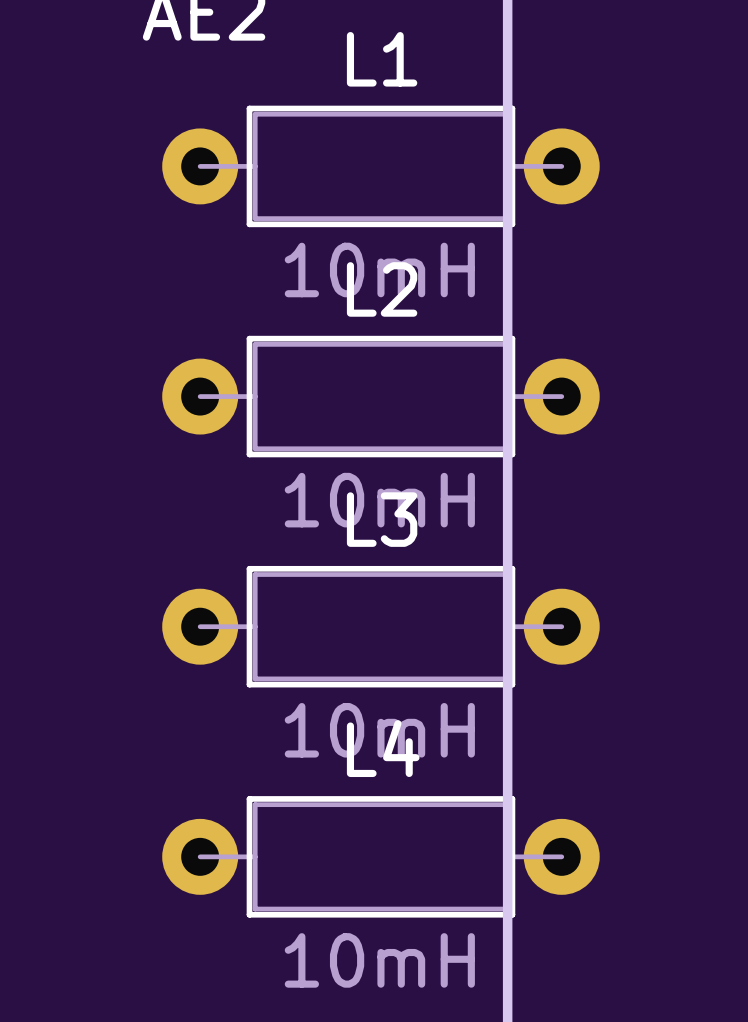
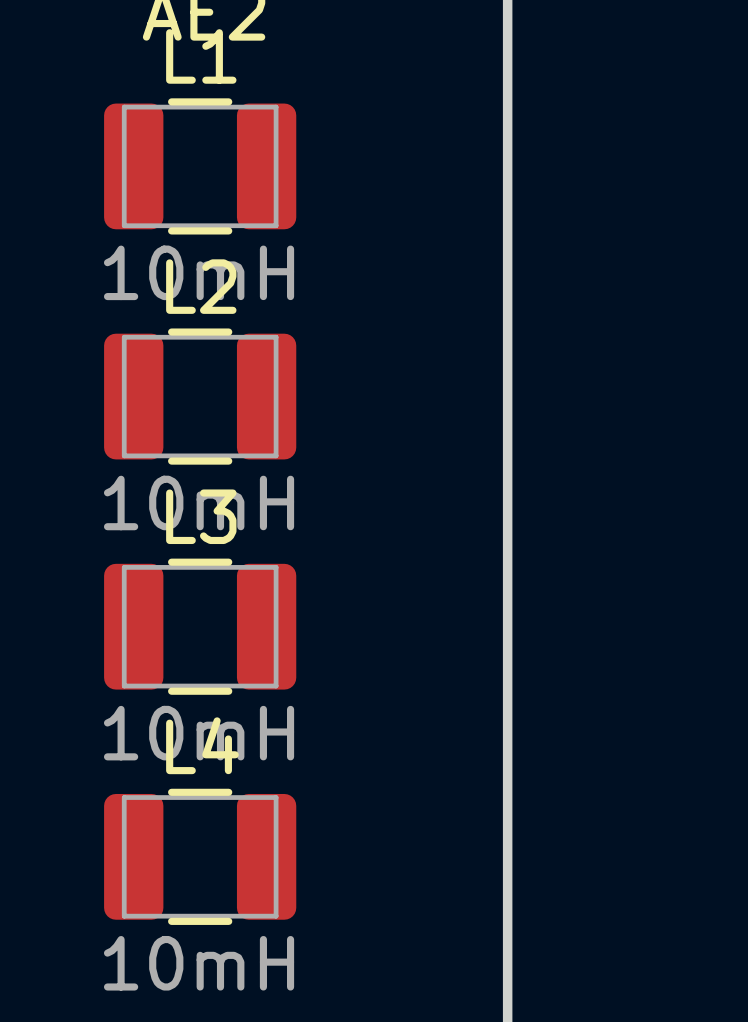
L1 footprint: [162, 105, 600, 228] -> [104, 98, 297, 235]
L2 footprint: [162, 335, 600, 458] -> [104, 328, 297, 465]
L3 footprint: [162, 565, 600, 688] -> [104, 558, 297, 695]
L4 footprint: [162, 796, 600, 918] -> [104, 788, 297, 925]

